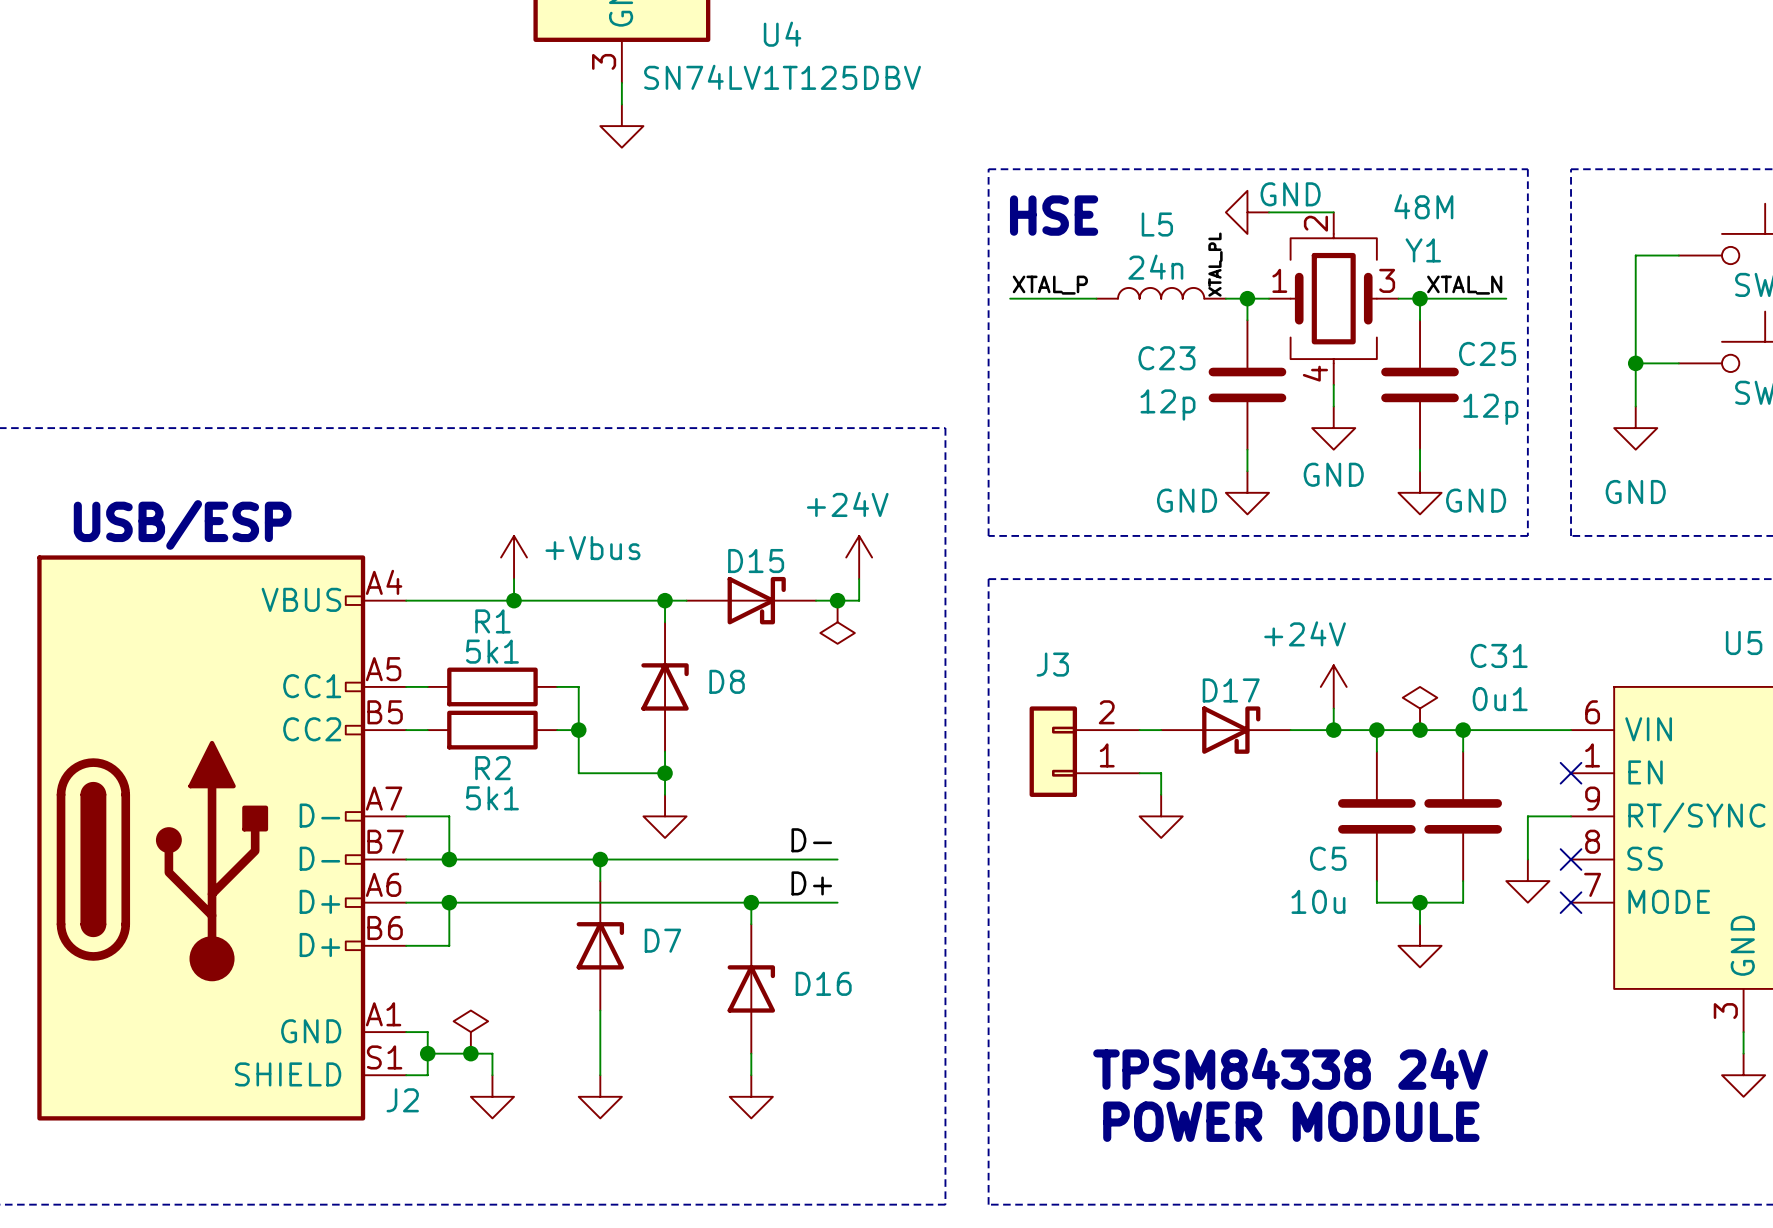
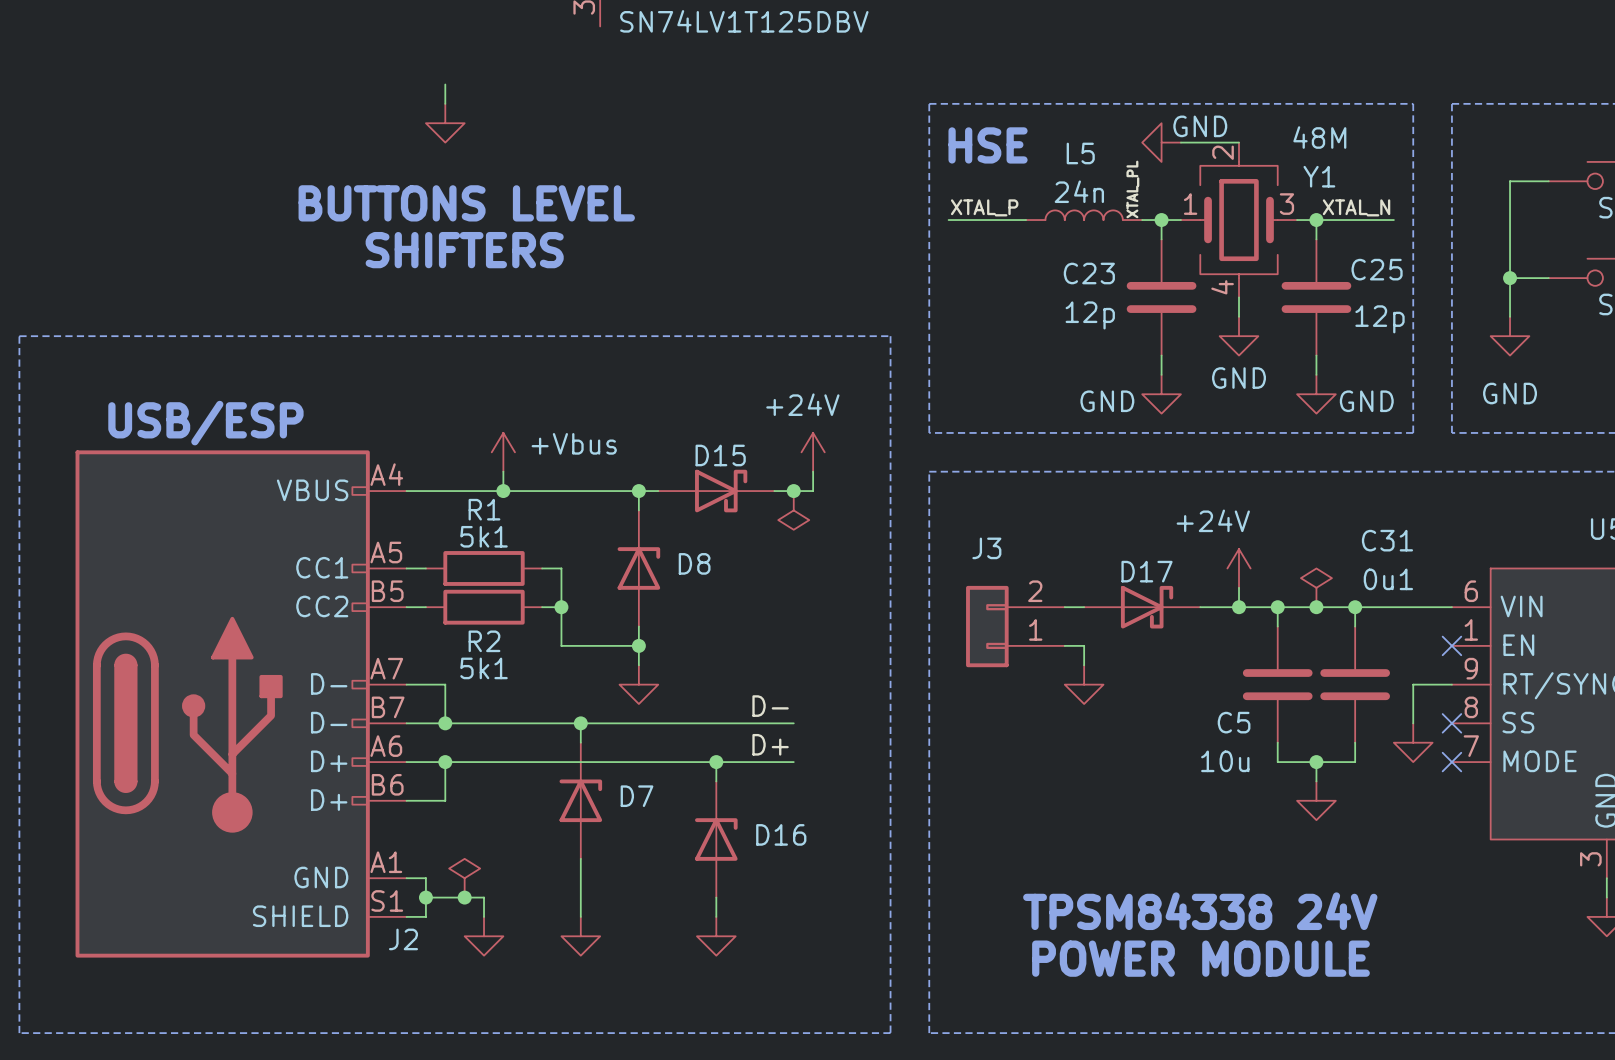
wire: (621, 82) (621, 104) -> (445, 84) (445, 103)
power symbol: (621, 126) -> none
power symbol: none -> (445, 123)
text: none -> BUTTONS LEVEL (466, 203)
text: none -> SHIFTERS (464, 250)

